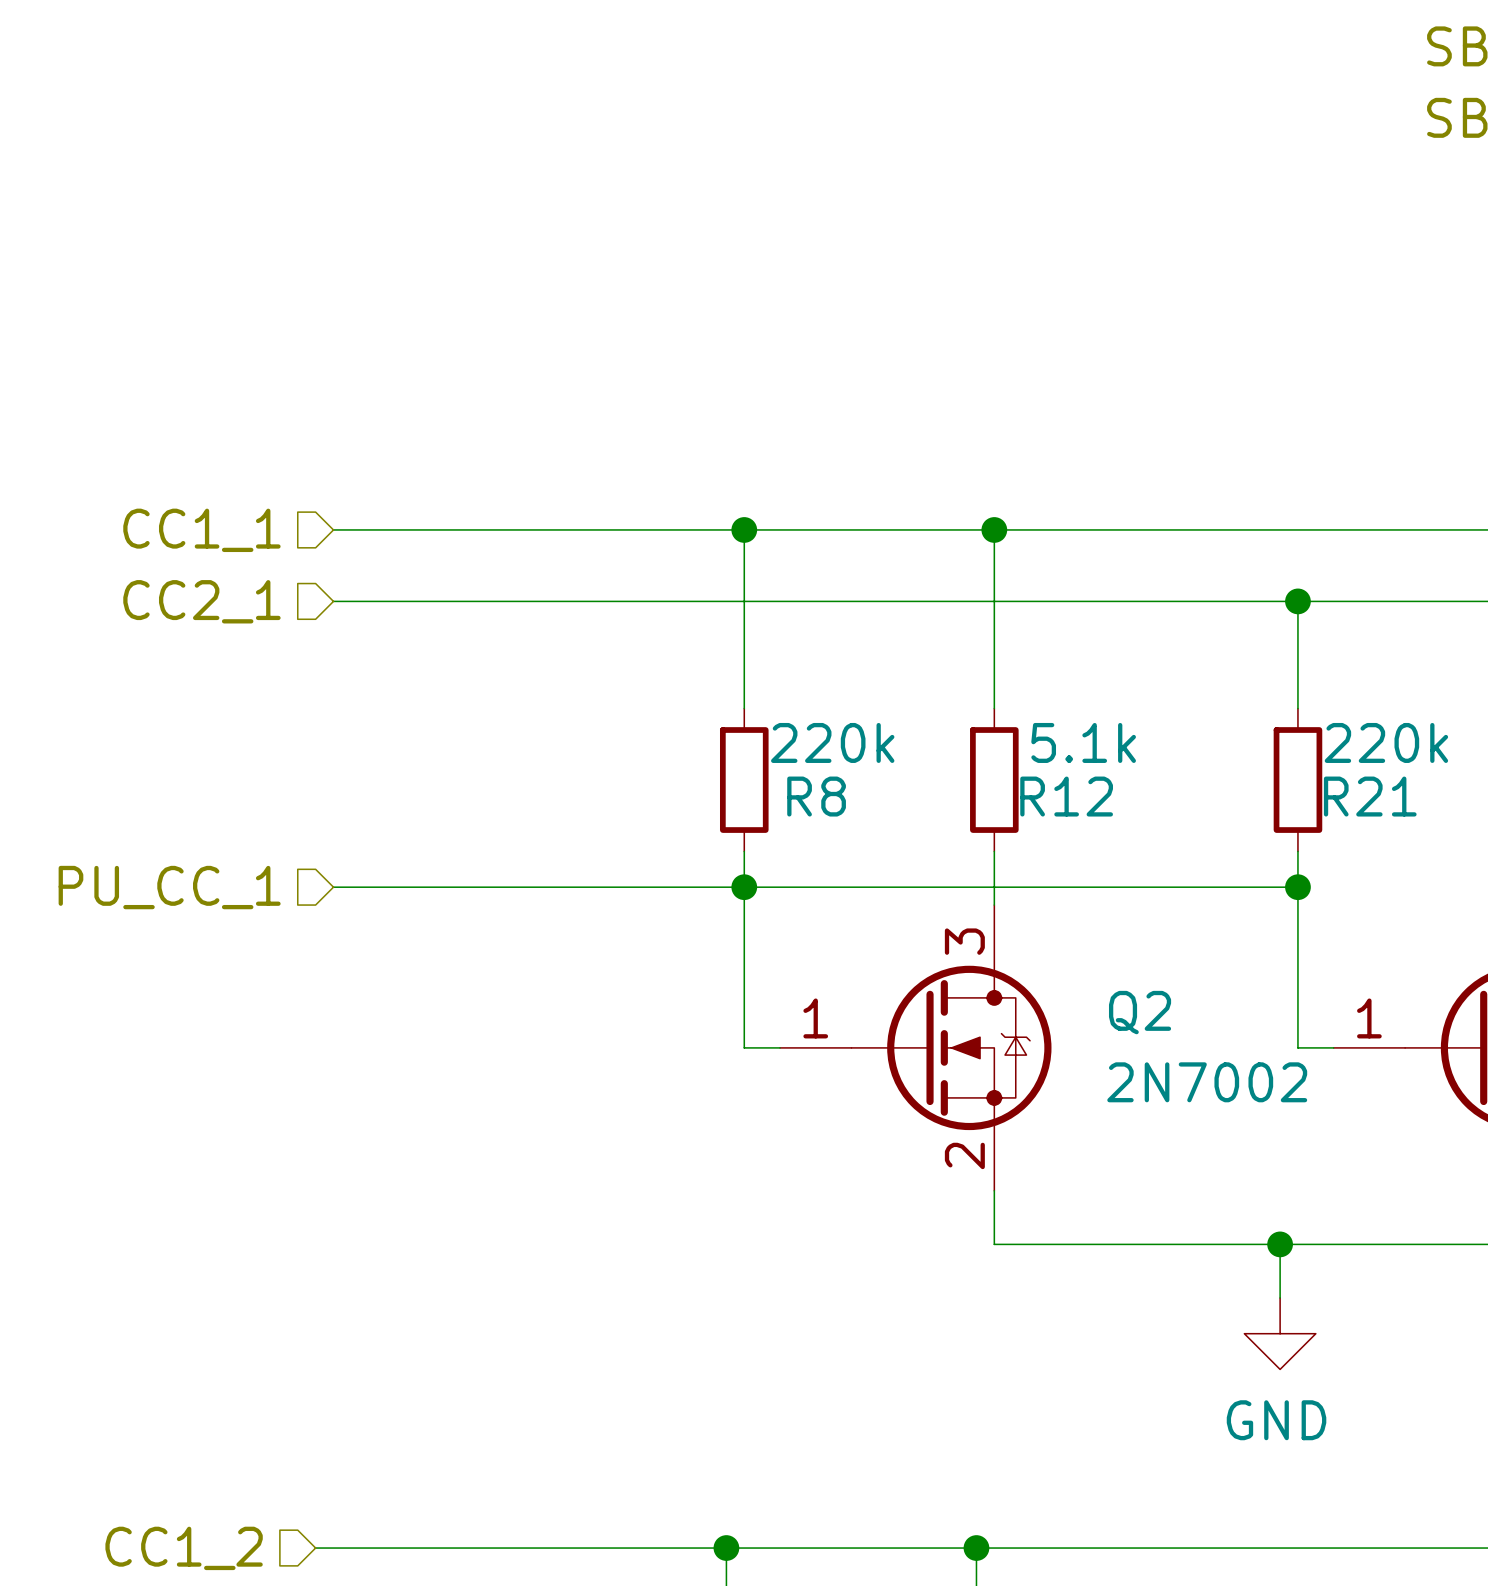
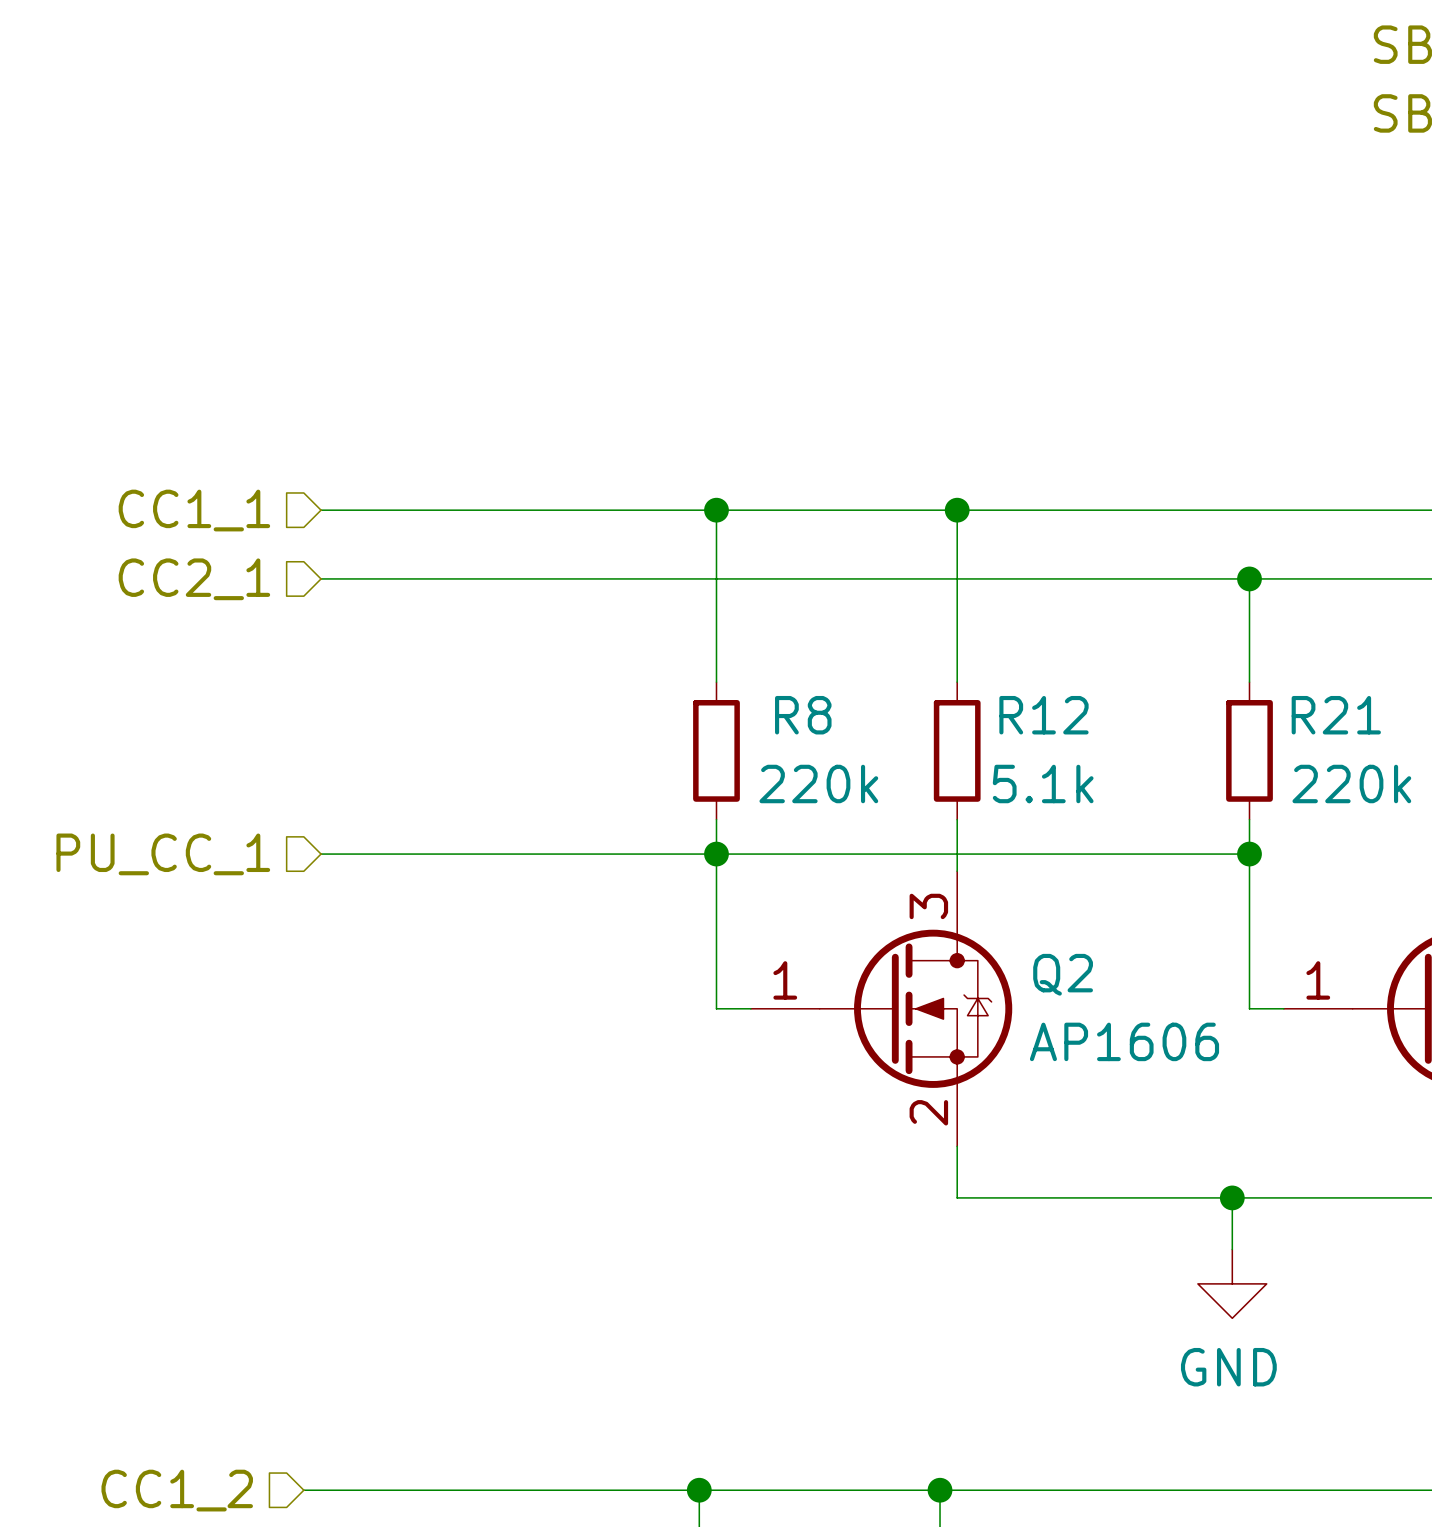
R8 value position: 220k (832, 742) -> 220k (818, 783)
R12 value position: 5.1k (1083, 742) -> 5.1k (1043, 783)
R21 value position: 220k (1386, 742) -> 220k (1351, 783)
R8 name position: R8 (816, 796) -> R8 (803, 715)
R12 name position: R12 (1066, 796) -> R12 (1043, 715)
R21 name position: R21 (1370, 796) -> R21 (1336, 715)
Q2 name position: Q2 (1140, 1012) -> Q2 (1063, 974)
Q2 value: 2N7002 (1207, 1082) -> AP1606 (1124, 1041)

